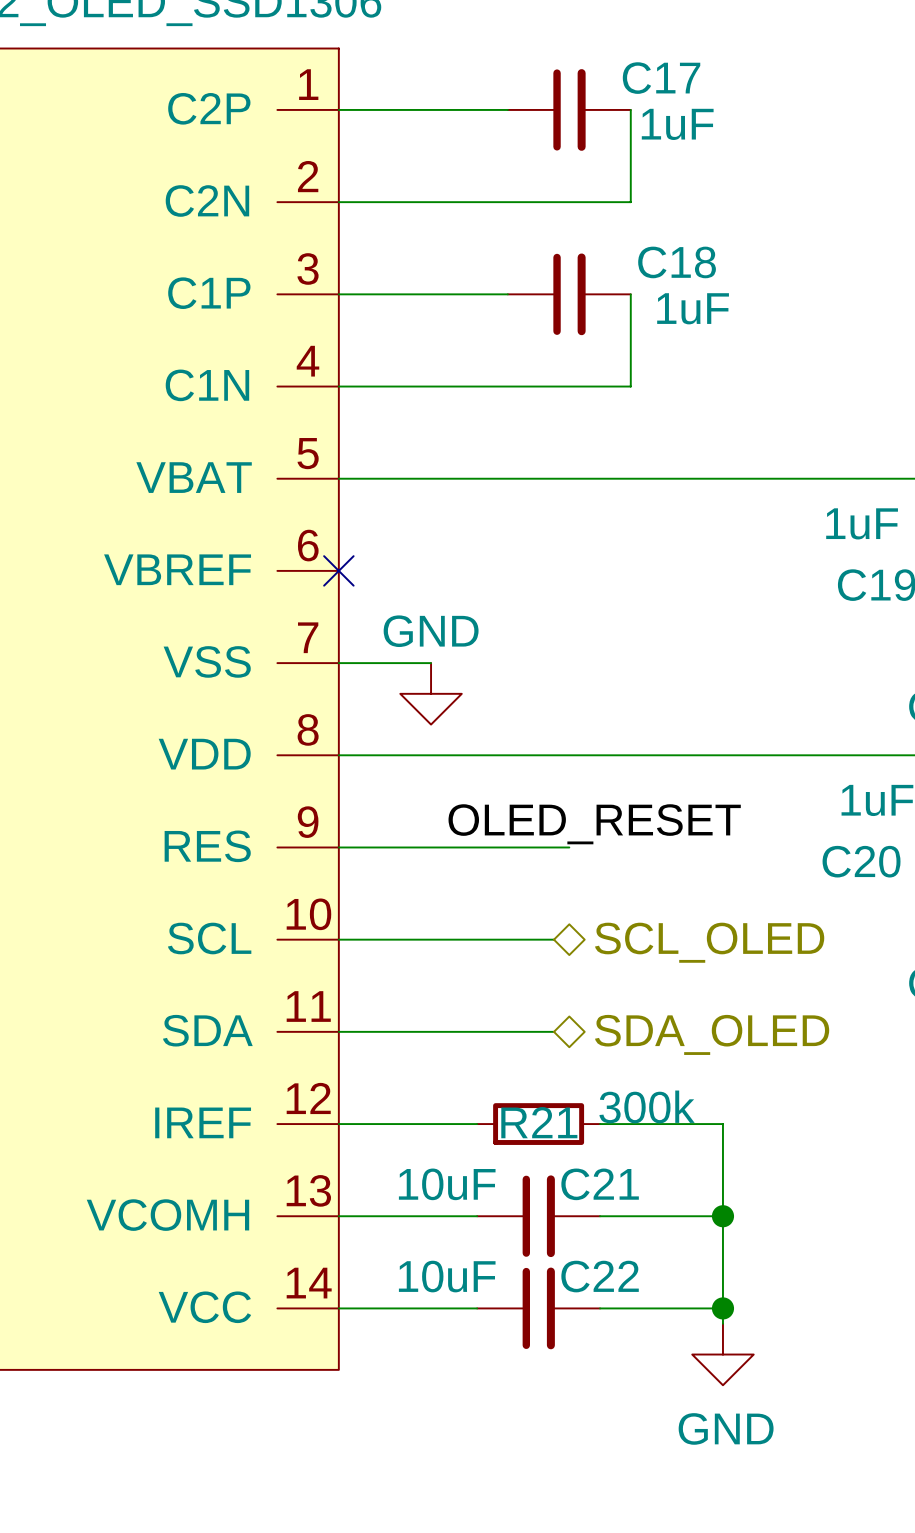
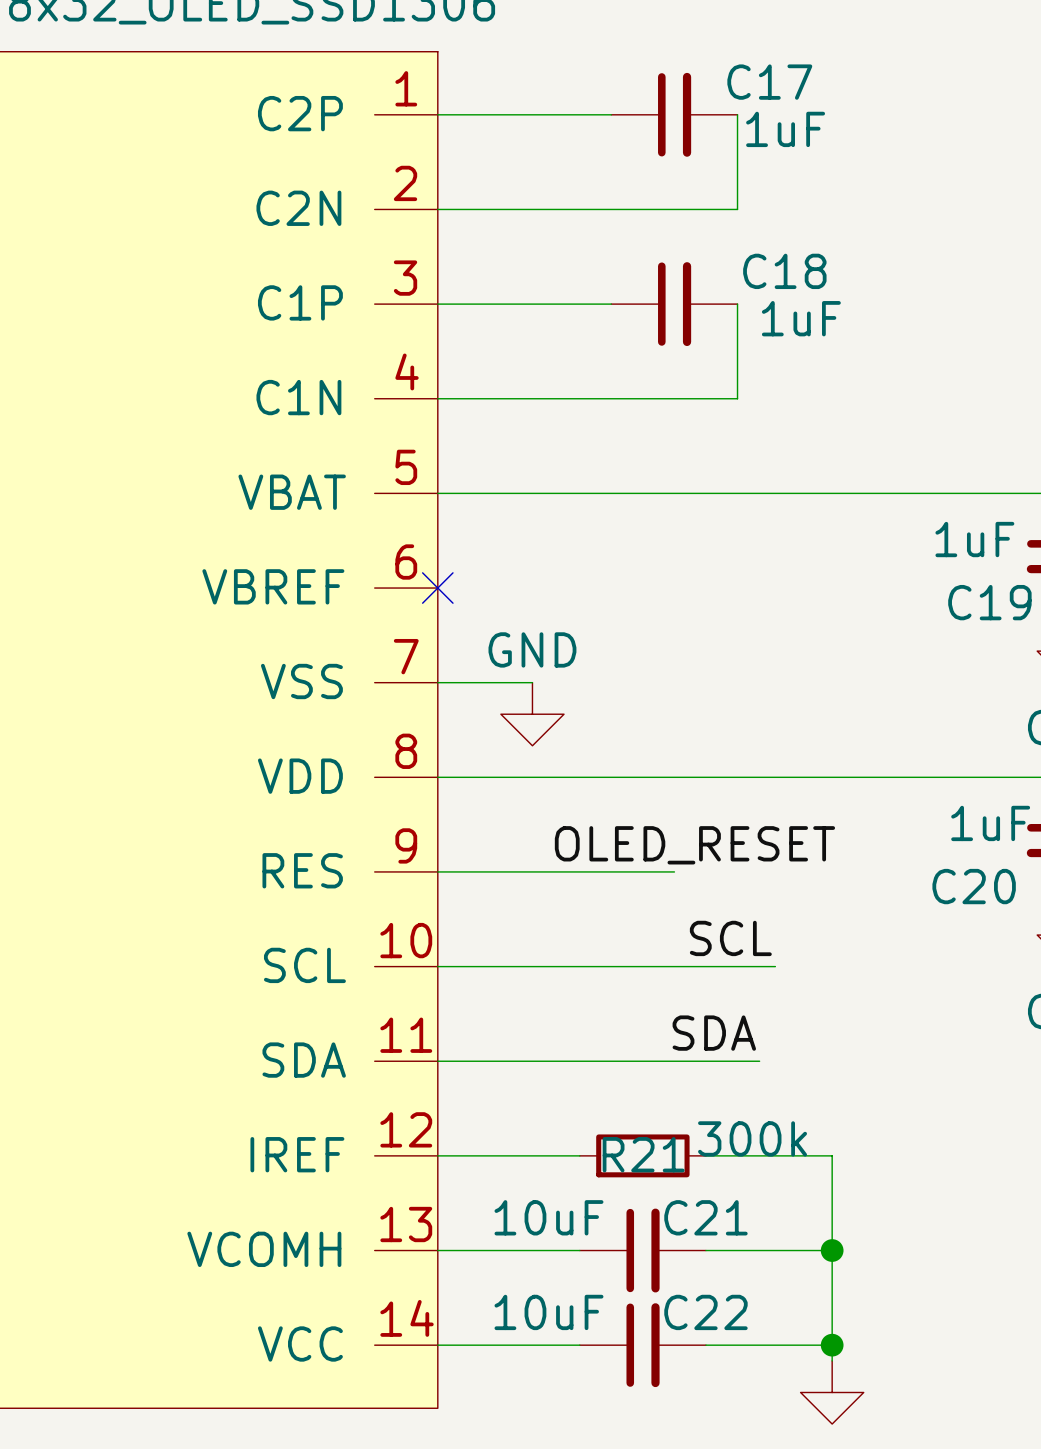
label: none -> SCL (730, 938)
wire: none -> (658, 966) (775, 966)
hierarchical label: SCL_OLED (709, 942) -> none
label: none -> SDA (714, 1033)
wire: none -> (658, 1061) (759, 1061)
hierarchical label: SDA_OLED (712, 1034) -> none

